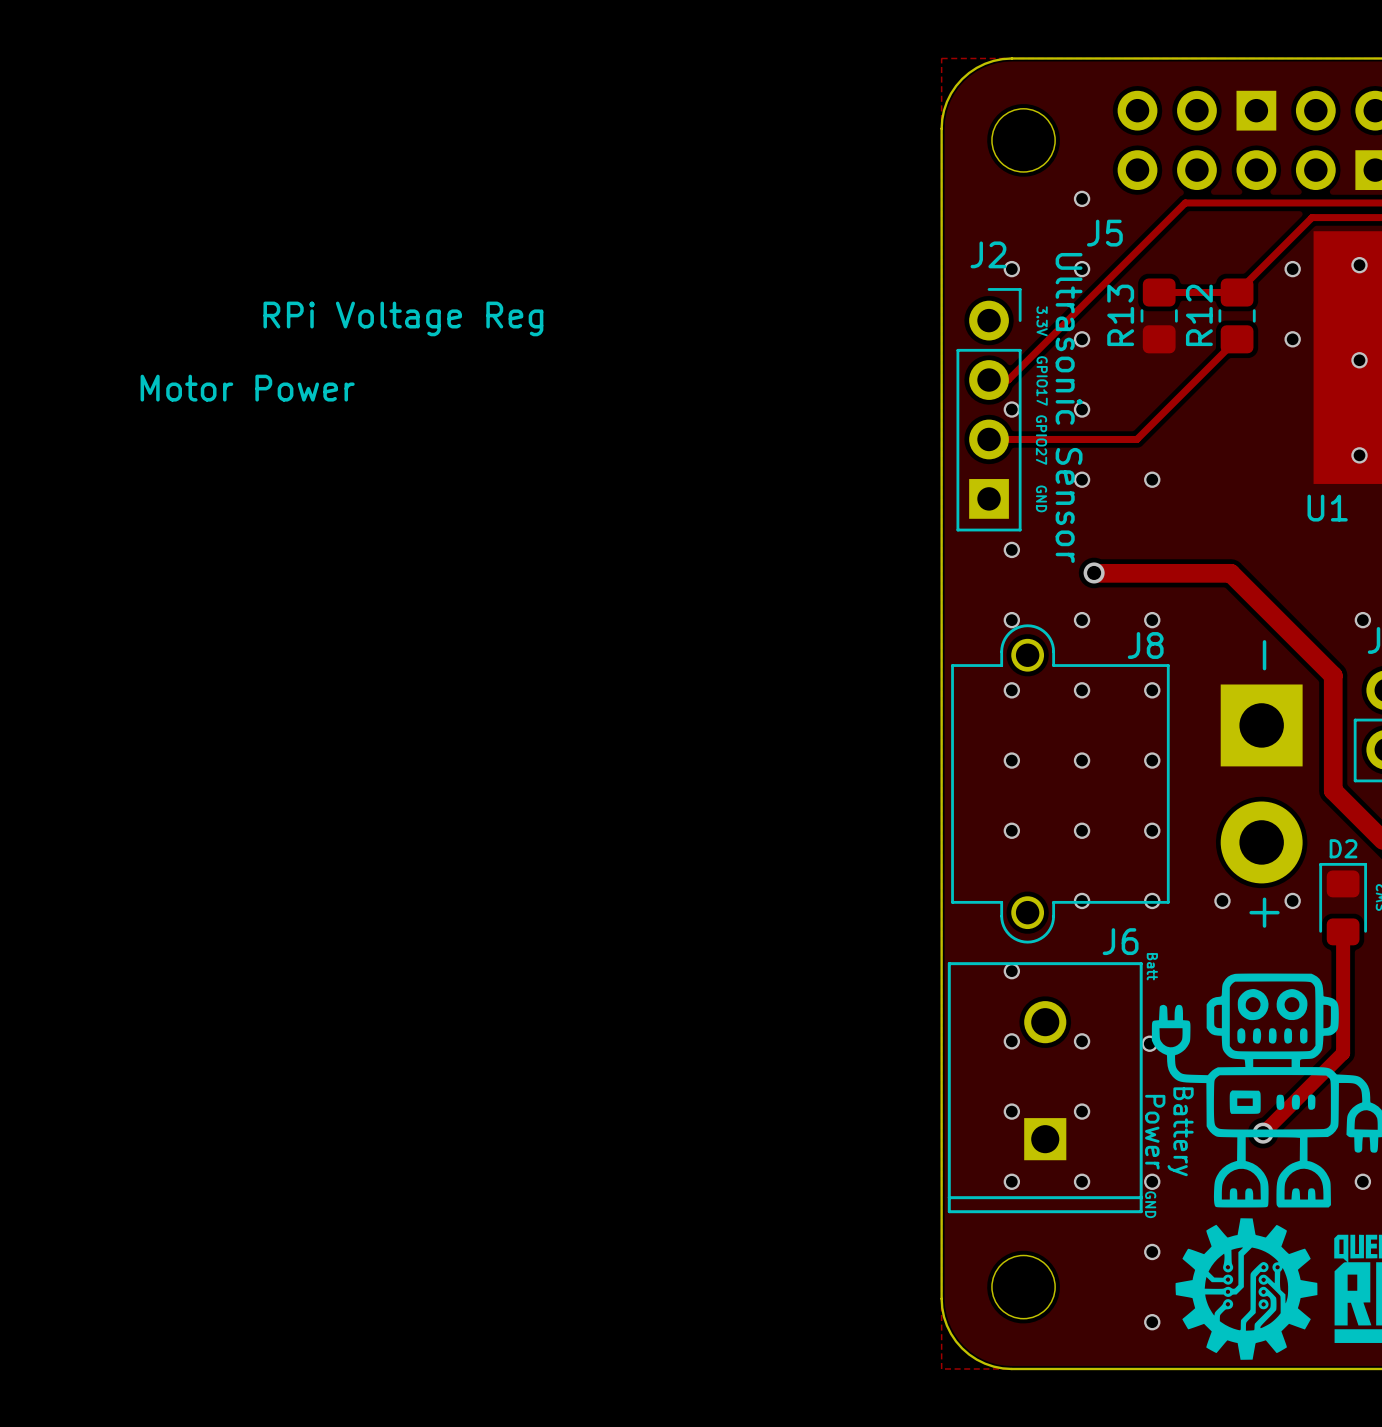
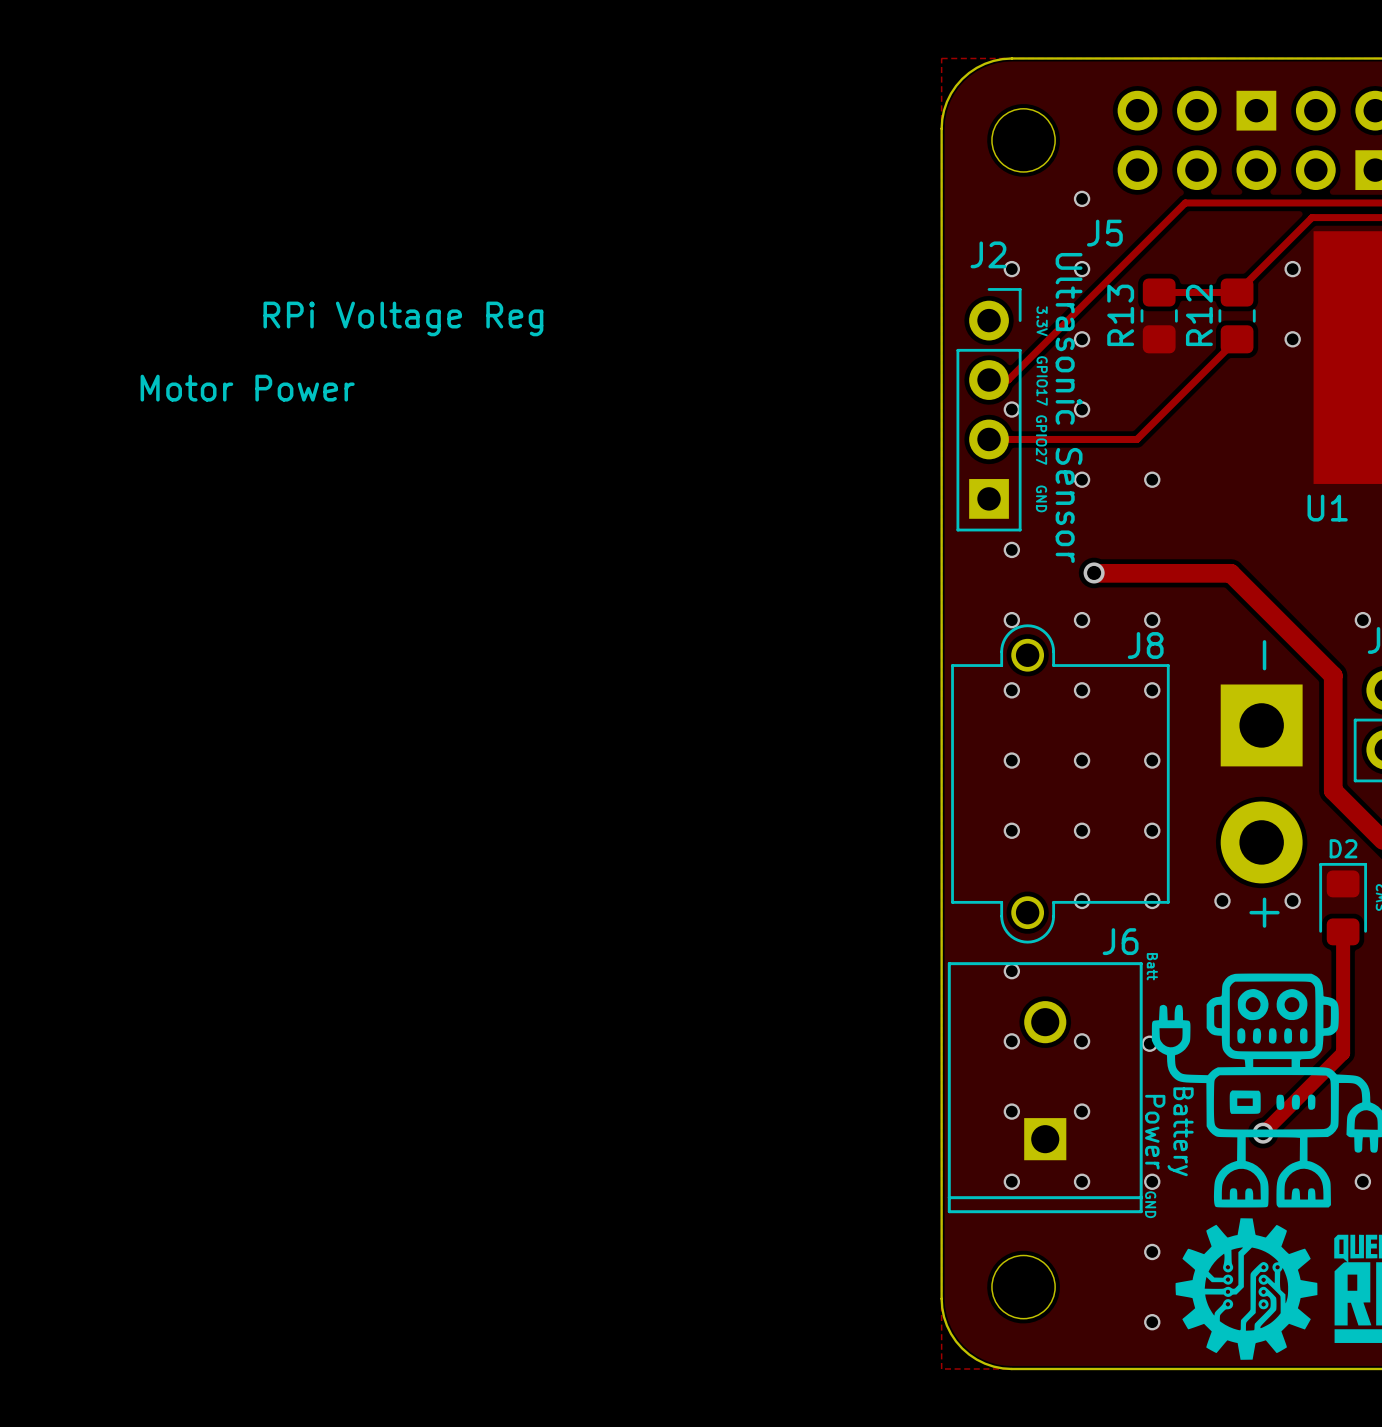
via: (1359, 265) -> none
via: (1359, 360) -> none
via: (1359, 455) -> none

